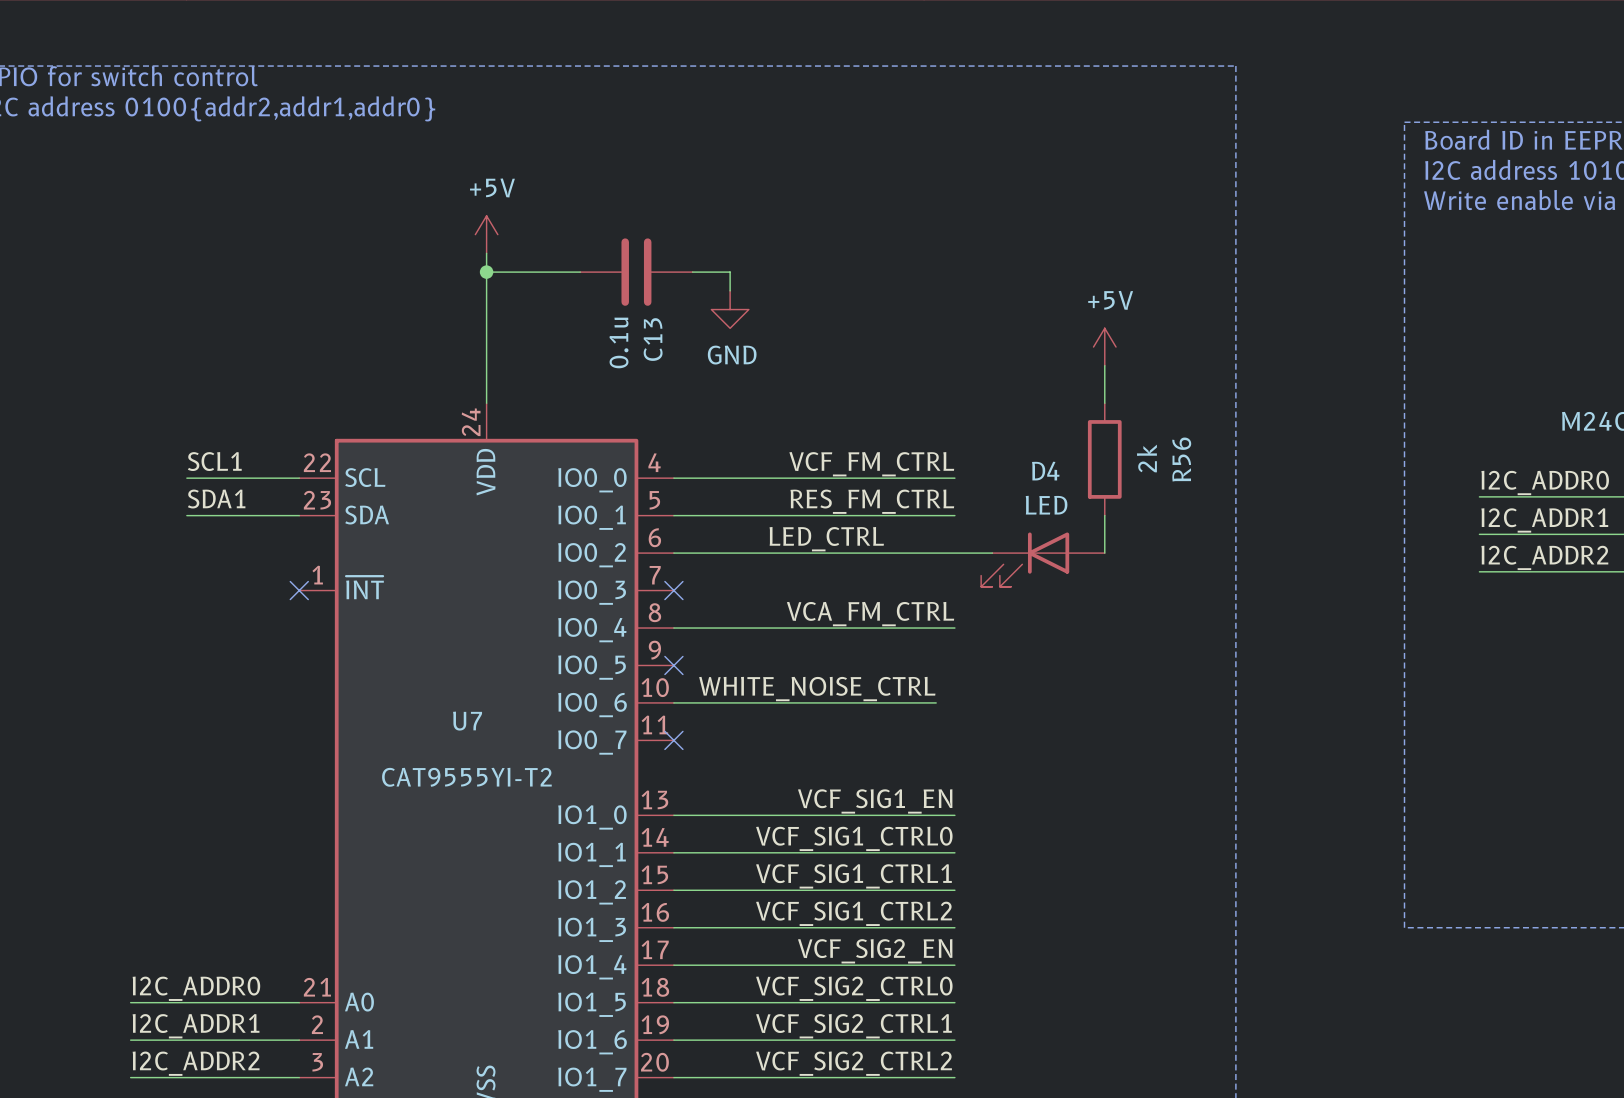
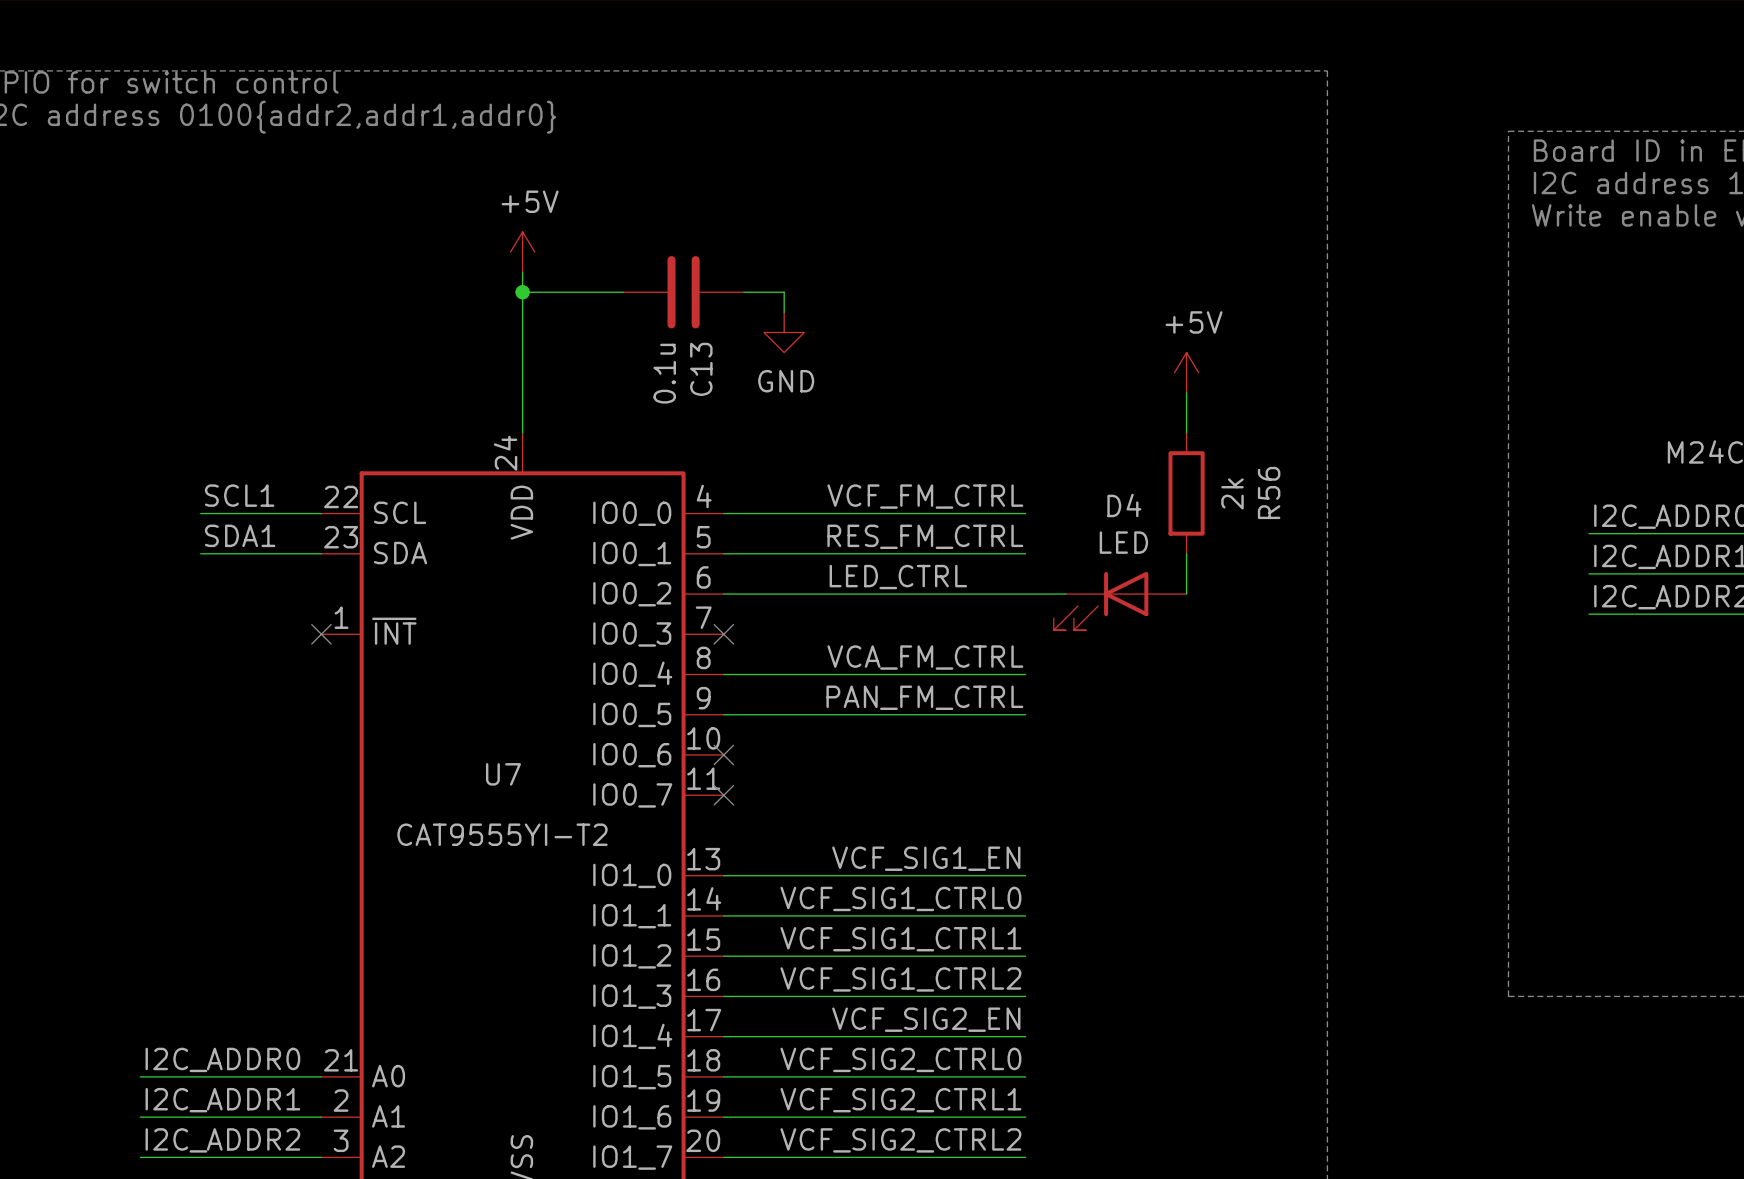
label: none -> PAN_FM_CTRL (924, 697)
wire: none -> (723, 714) (1025, 714)
no-connect mark position: (673, 665) -> (723, 754)
label: WHITE_NOISE_CTRL (817, 689) -> none
wire: (673, 702) (936, 702) -> none

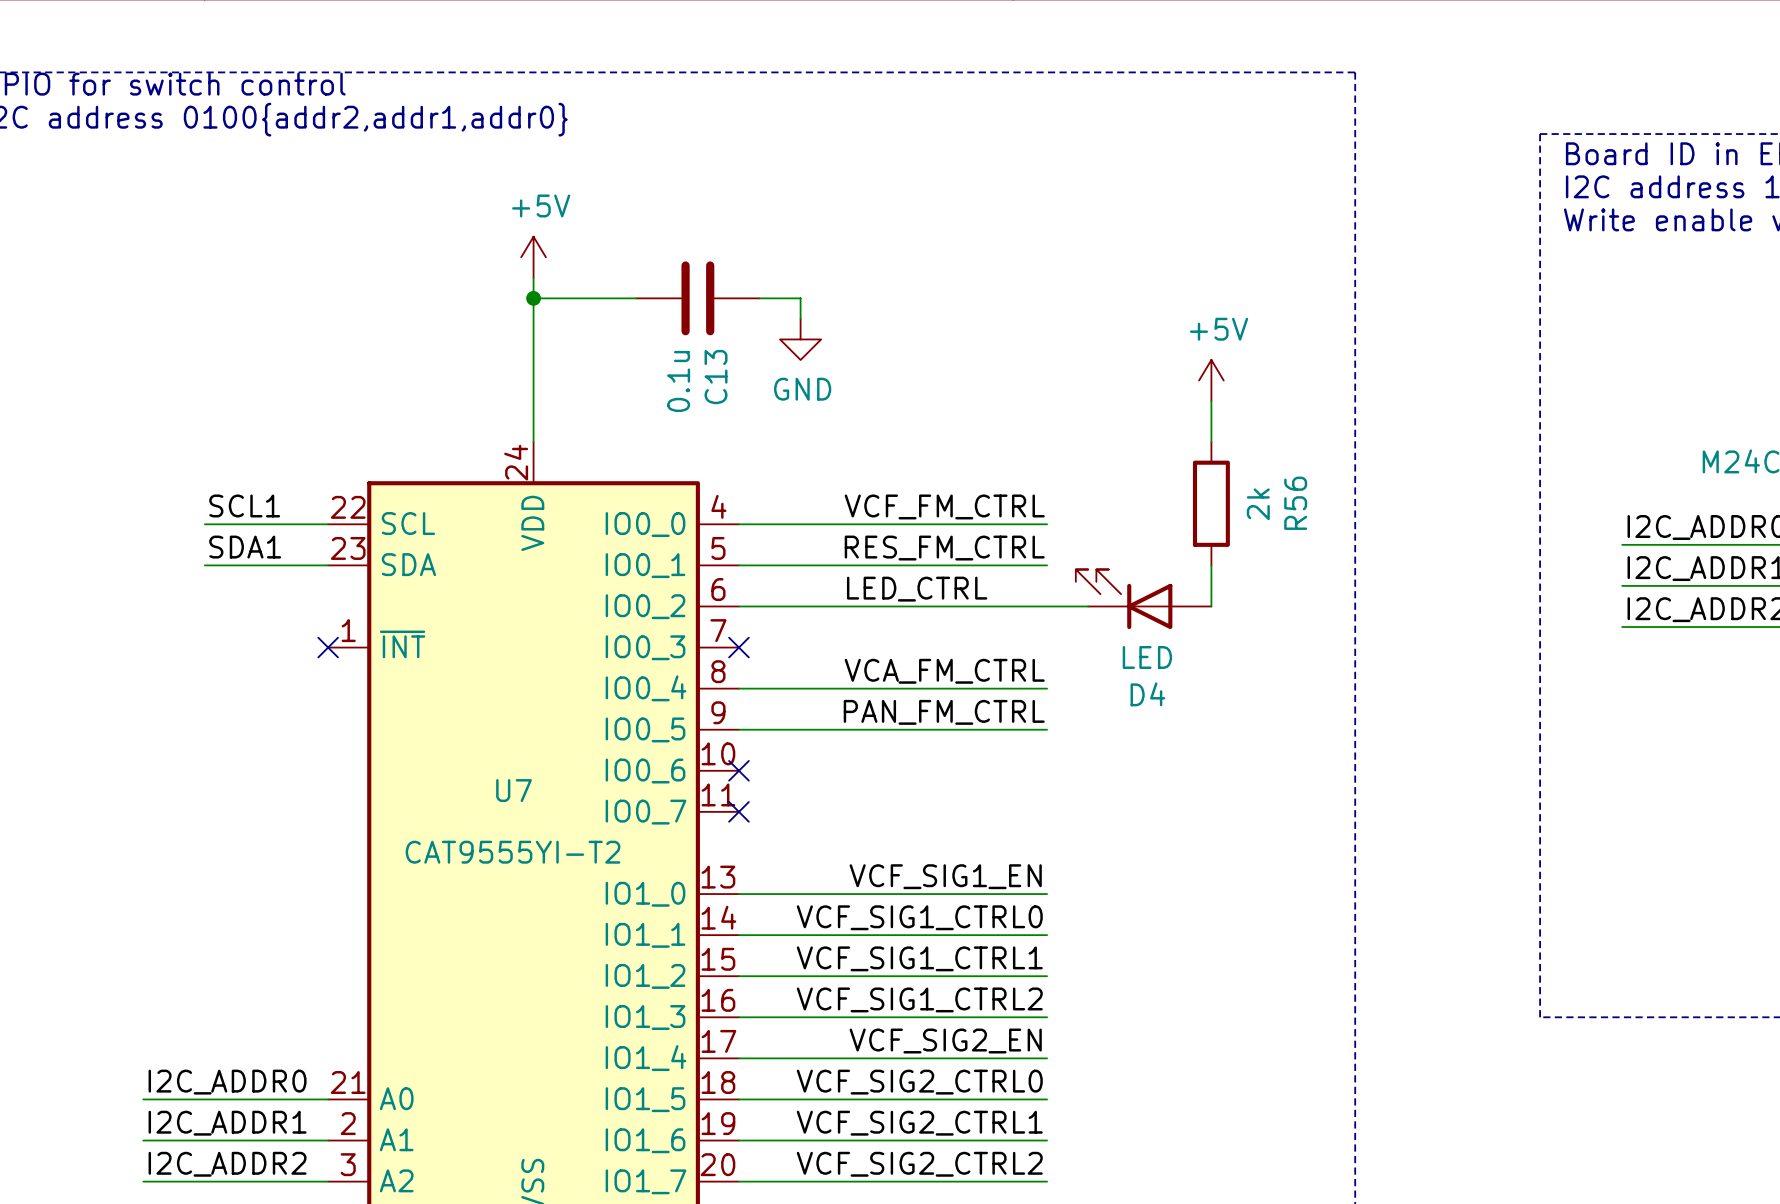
D4 flip: as is (1101, 601) -> up-down (1124, 599)

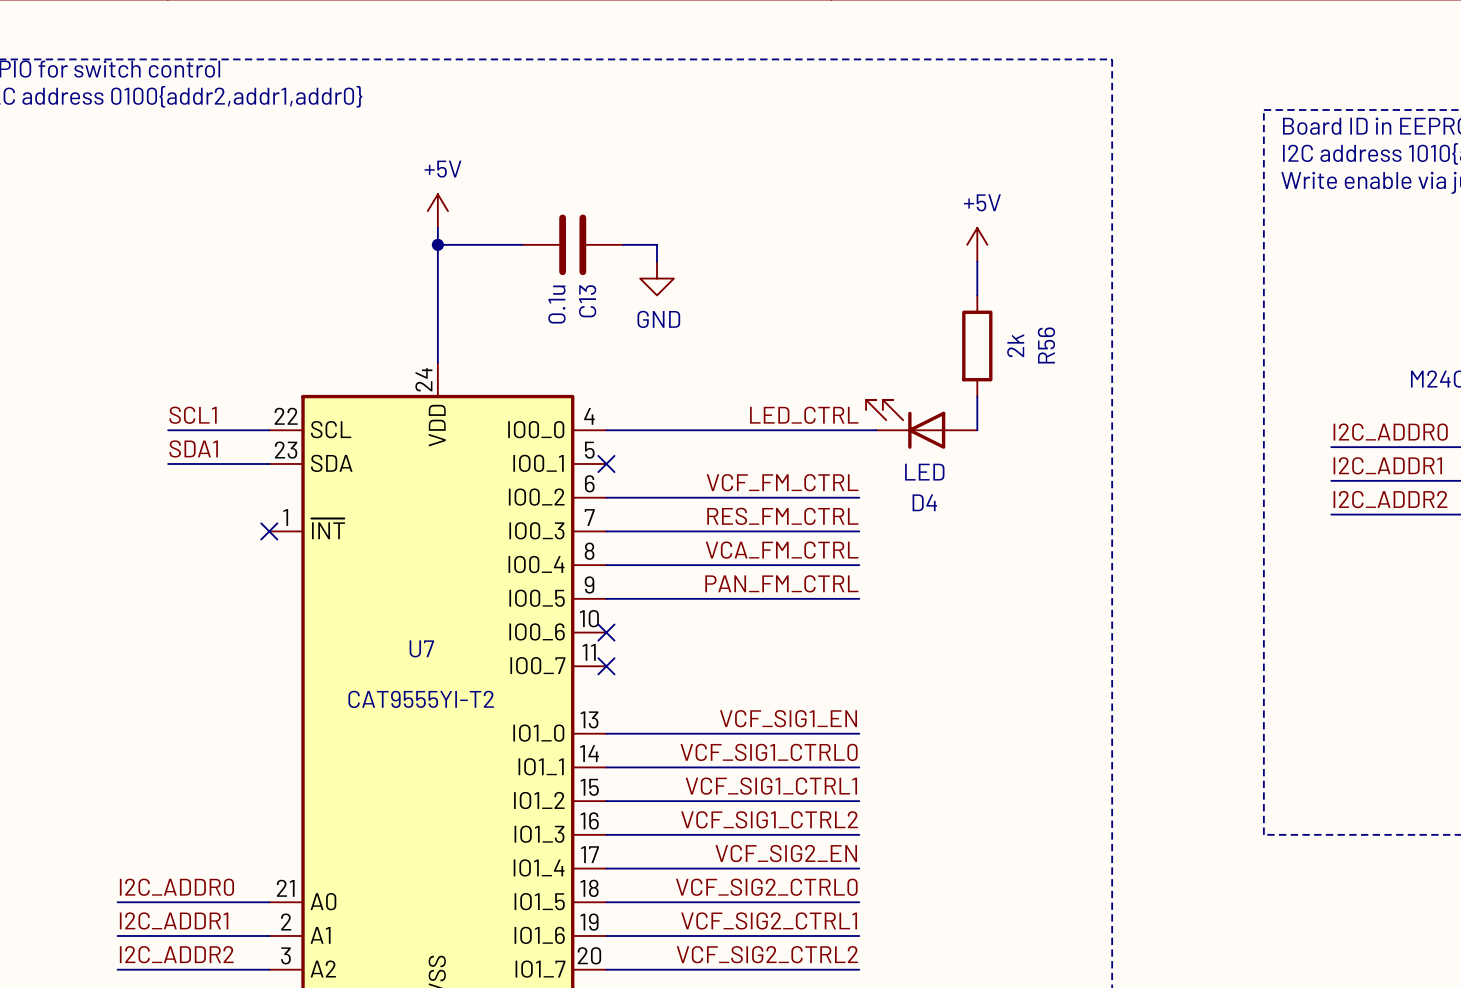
power symbol position: +5V (1211, 380) -> +5V (977, 244)
wire: (1211, 401) (1211, 442) -> (977, 261) (977, 295)
R56 position: (1211, 503) -> (977, 345)
label: VCF_FM_CTRL (944, 506) -> LED_CTRL (804, 415)
wire: none -> (859, 430) (876, 430)
label position: RES_FM_CTRL (944, 548) -> RES_FM_CTRL (782, 516)
wire: (738, 565) (1047, 565) -> (606, 531) (859, 531)
wire: (1211, 565) (1211, 606) -> (977, 396) (977, 430)
label: LED_CTRL (917, 589) -> none
label: none -> VCF_FM_CTRL (782, 482)
D4 position: (1143, 599) -> (921, 424)
wire: (1047, 606) (1088, 606) -> none
no-connect mark position: (738, 647) -> (606, 463)

